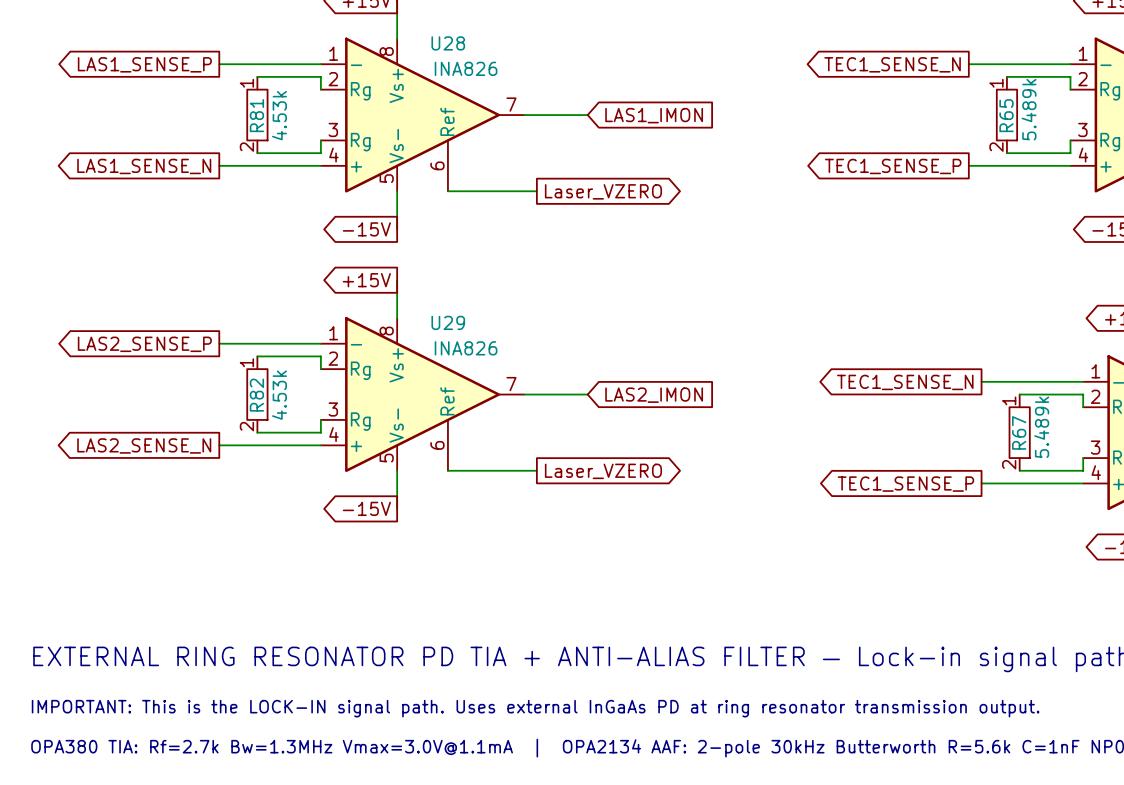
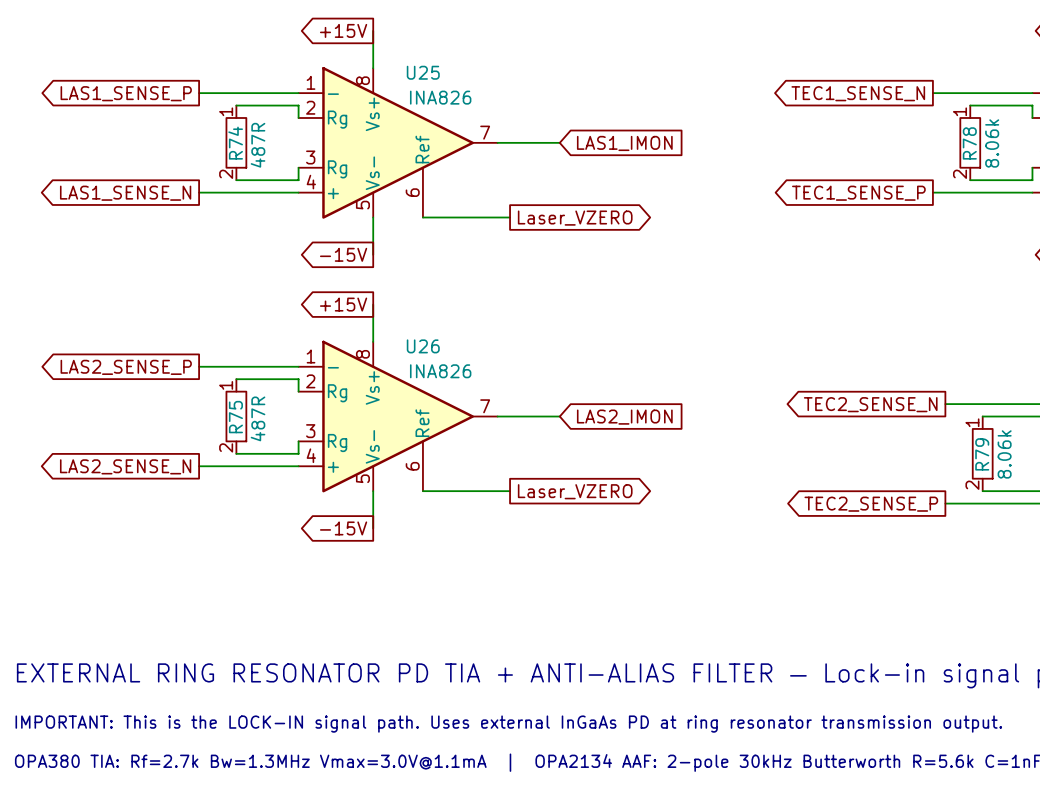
U28 name: U28 (448, 43) -> U25 (423, 72)
R65 value: 5.489k (1029, 109) -> 8.06k (992, 143)
R81 name: R81 (256, 115) -> R74 (235, 143)
R81 value: 4.53k (279, 115) -> 487R (258, 145)
R65 name: R65 (1006, 115) -> R78 (969, 143)
U29 name: U29 (448, 322) -> U26 (423, 346)
global label: TEC1_SENSE_N (905, 382) -> TEC2_SENSE_N (870, 404)
R82 name: R82 (256, 395) -> R75 (235, 417)
R82 value: 4.53k (279, 395) -> 487R (258, 418)
R67 value: 5.489k (1041, 427) -> 8.06k (1004, 454)
R67 name: R67 (1019, 432) -> R79 (982, 454)
global label: TEC1_SENSE_P (905, 484) -> TEC2_SENSE_P (871, 504)

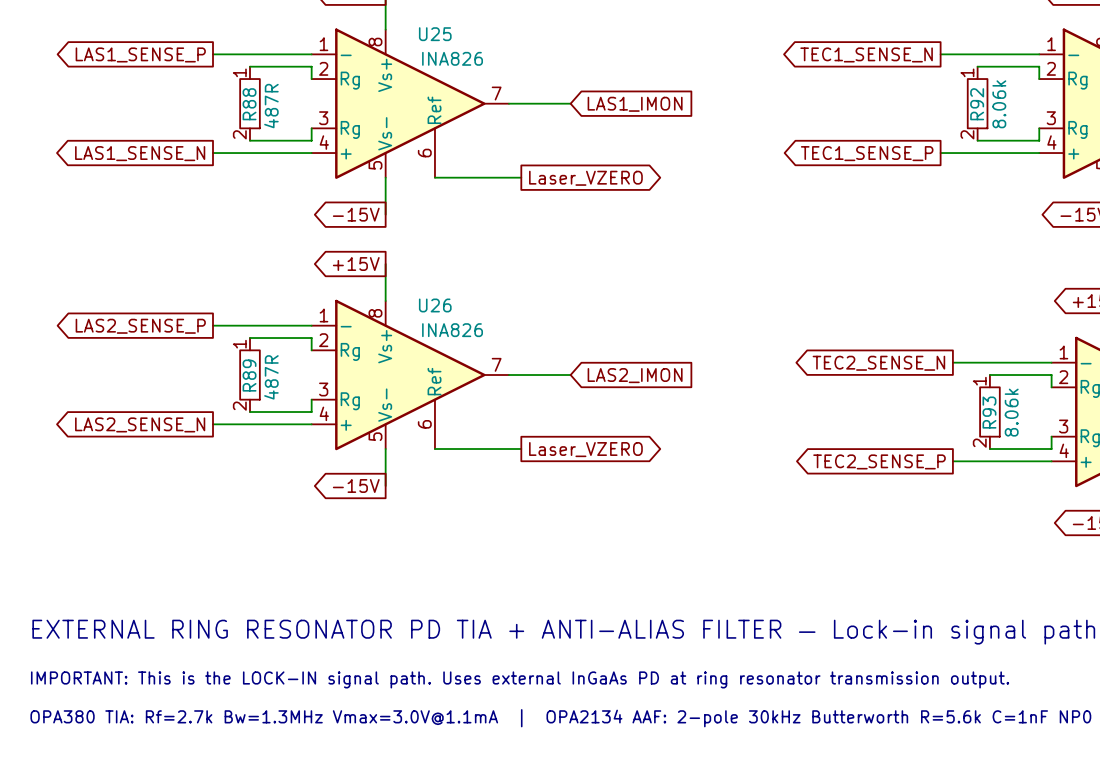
R74 name: R74 (235, 143) -> R88 (249, 104)
R78 name: R78 (969, 143) -> R92 (977, 104)
R75 name: R75 (235, 417) -> R89 (249, 375)
R79 name: R79 (982, 454) -> R93 (989, 412)

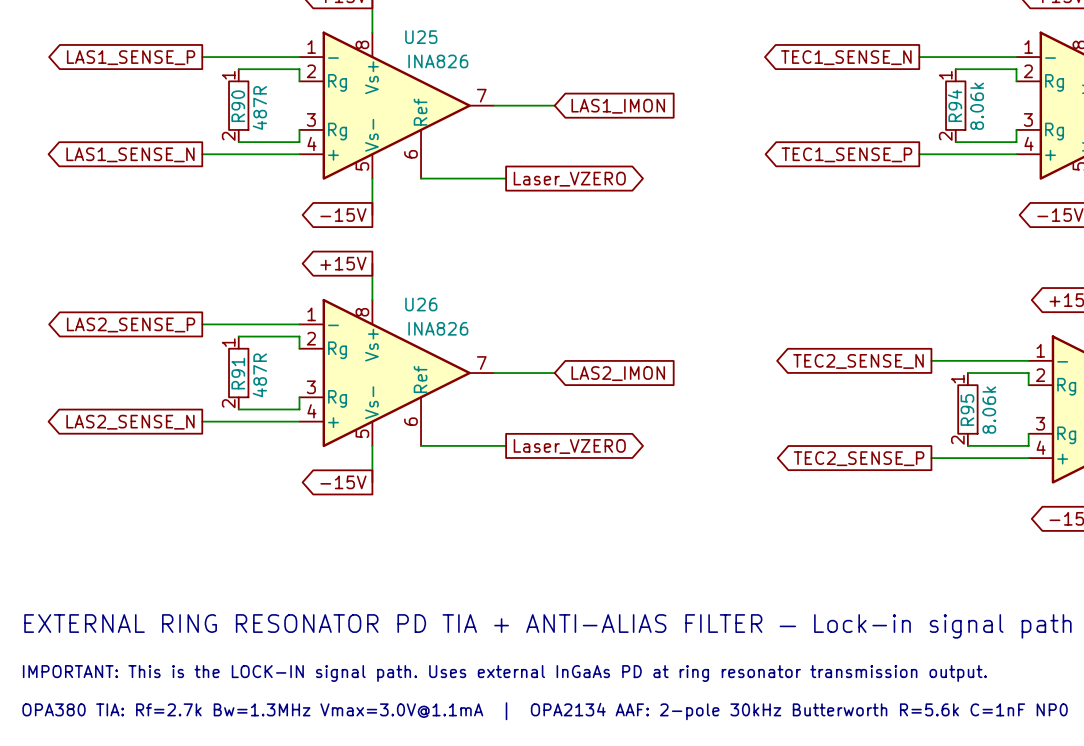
R88 name: R88 (249, 104) -> R90 (238, 106)
R92 name: R92 (977, 104) -> R94 (955, 105)
R89 name: R89 (249, 375) -> R91 (238, 373)
R93 name: R93 (989, 412) -> R95 (967, 410)

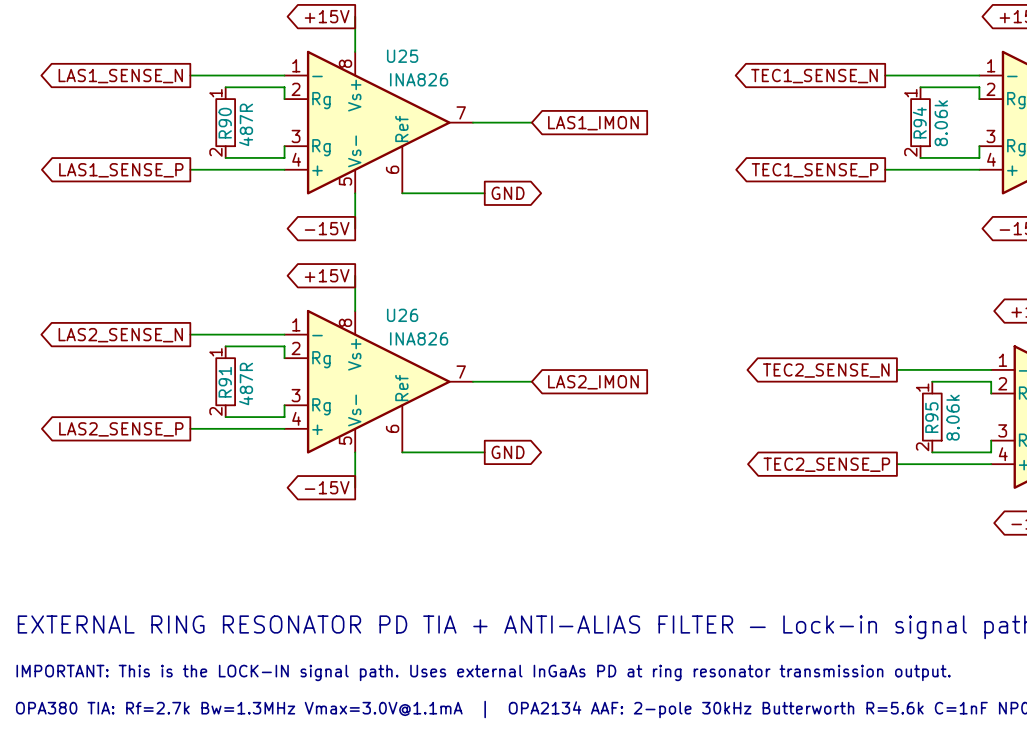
global label: LAS1_SENSE_P (131, 57) -> LAS1_SENSE_N (120, 76)
global label: LAS1_SENSE_N (130, 154) -> LAS1_SENSE_P (121, 170)
global label: Laser_VZERO (569, 179) -> GND (508, 193)
global label: LAS2_SENSE_P (131, 324) -> LAS2_SENSE_N (120, 335)
global label: LAS2_SENSE_N (130, 422) -> LAS2_SENSE_P (121, 429)
global label: Laser_VZERO (569, 446) -> GND (508, 452)

